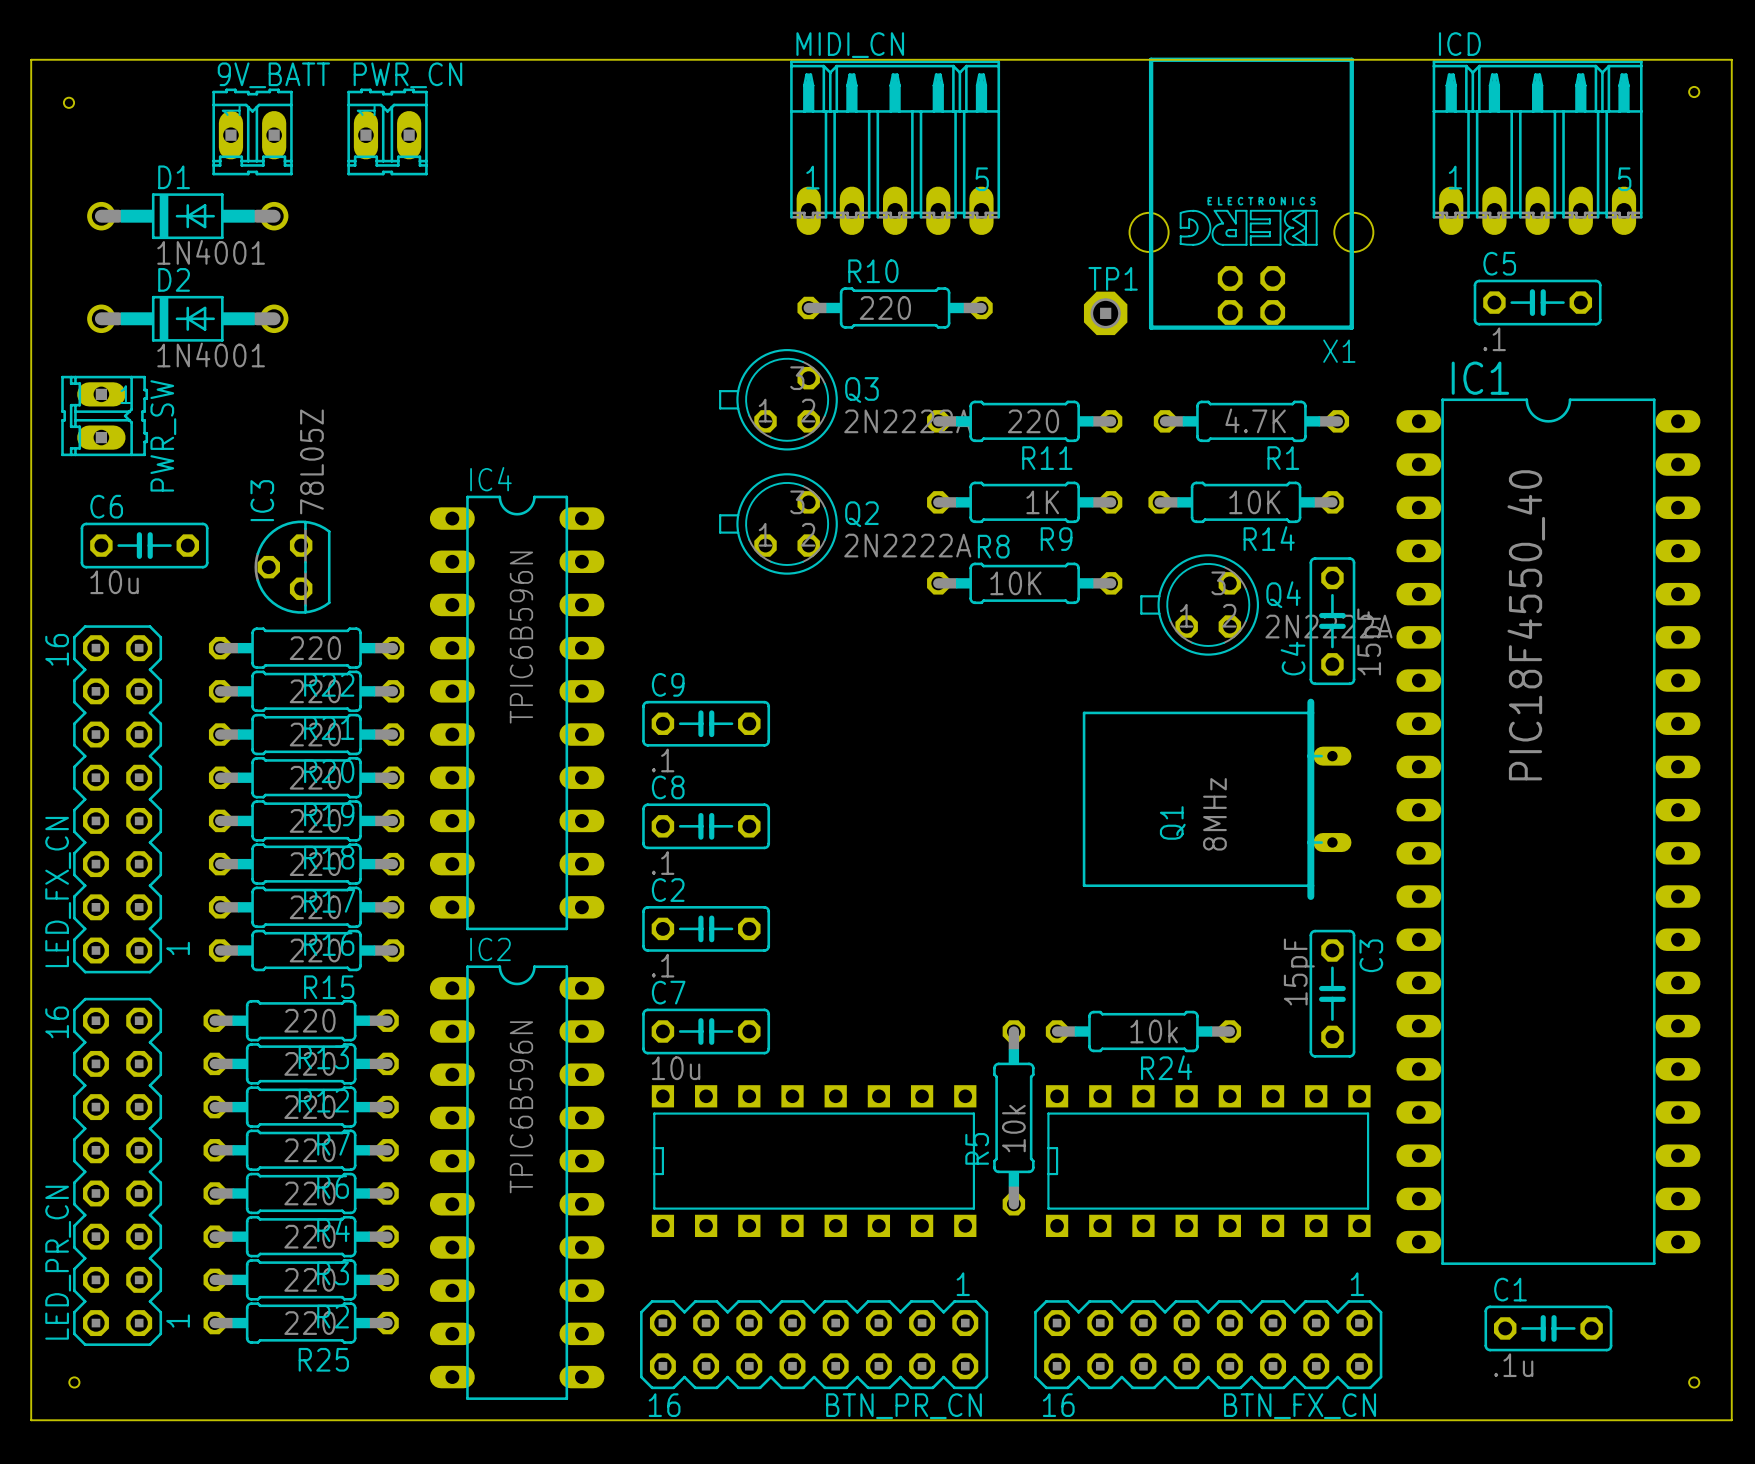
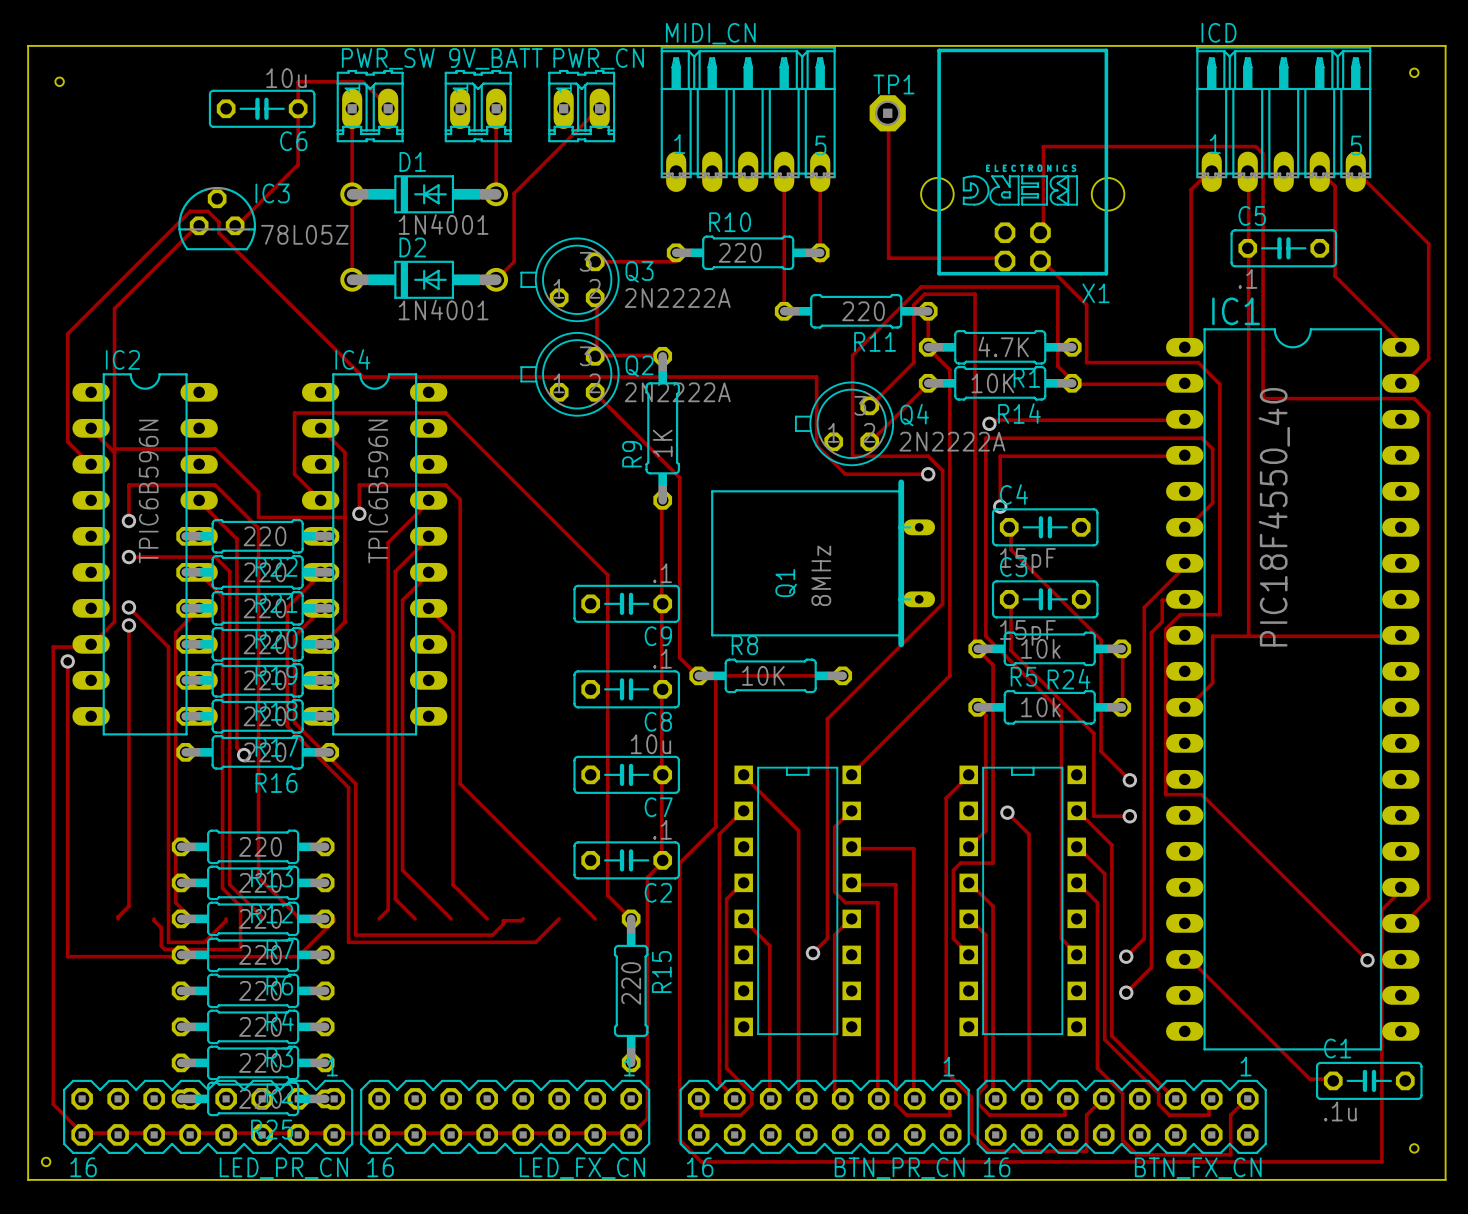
9V_BATT position: (252, 131) -> (478, 106)
PWR_CN position: (387, 131) -> (581, 106)
PWR_SW: none -> (370, 106)
track: none -> (352, 108) (352, 279)
track: none -> (388, 108) (362, 81) (298, 81) (298, 164) (235, 225)
track: none -> (496, 108) (496, 194)
track: none -> (599, 108) (514, 193) (514, 261) (496, 279)
track: none -> (887, 113) (888, 258) (1003, 258) (1005, 261)
X1 position: (1251, 193) -> (1022, 162)
track: none -> (784, 171) (784, 311)
track: none -> (820, 171) (820, 261)
track: none -> (1211, 171) (1209, 171) (1191, 189) (1191, 344) (1189, 347)
track: none -> (1247, 171) (1248, 636)
track: none -> (1319, 171) (1335, 186) (1335, 276) (1405, 347)
track: none -> (1355, 171) (1428, 243) (1428, 359) (1405, 383)
D1 position: (187, 216) -> (424, 194)
track: none -> (199, 225) (114, 308) (114, 621) (89, 647) (53, 647) (53, 1104) (82, 1133)
track: none -> (1040, 232) (1043, 229) (1043, 146) (1255, 146) (1263, 153) (1263, 398) (1414, 398) (1428, 413) (1428, 899) (1405, 923)
TP1 position: (1105, 313) -> (887, 113)
track: none -> (1040, 261) (1043, 261) (1086, 305) (1086, 362) (1198, 362) (1219, 384) (1219, 614) (1180, 614) (1165, 629) (1165, 794) (1201, 794) (1367, 960)
D2 position: (187, 318) -> (424, 279)
track: none -> (595, 261) (676, 261)
track: none -> (595, 297) (596, 297) (596, 355)
track: none -> (928, 311) (928, 348) (949, 369) (949, 675) (851, 774)
Q3 position: (778, 399) -> (569, 279)
PWR_SW: (104, 415) -> none
R11 position: (1024, 421) -> (856, 311)
R1 position: (1251, 421) -> (1000, 347)
track: none -> (596, 355) (662, 356)
track: none -> (928, 383) (869, 441)
track: none -> (1189, 383) (1072, 384) (1072, 380) (1057, 366) (1057, 287) (921, 287) (852, 355) (852, 456) (928, 456) (942, 470) (942, 603) (827, 719) (827, 938) (813, 953)
track: none -> (595, 392) (679, 477) (679, 657) (698, 675)
track: none -> (869, 405) (913, 362) (913, 305) (924, 294) (975, 294) (975, 647) (993, 665) (993, 863) (960, 863) (953, 870) (953, 938) (968, 954)
R9 rotation: 0° (1024, 502) -> 90° clockwise (662, 428)
R9 position: (1024, 502) -> (662, 428)
R14 position: (1246, 502) -> (1000, 383)
R14 value position: 10K (1254, 502) -> 10K (992, 383)
track: none -> (1189, 419) (989, 420) (989, 423)
via: none -> (989, 423)
track: none -> (91, 428) (114, 452)
track: none -> (320, 428) (344, 452) (344, 621) (320, 644)
Q2 position: (778, 523) -> (569, 374)
track: none -> (114, 449) (215, 449) (258, 492) (258, 517) (344, 517)
C6 rotation: 0° (144, 545) -> 180° (262, 108)
C6 position: (144, 545) -> (262, 108)
track: none -> (1189, 455) (1000, 456) (1000, 506)
track: none -> (91, 464) (67, 441) (67, 333) (190, 211) (208, 211) (218, 222) (218, 233) (362, 377) (816, 377) (816, 445) (845, 474) (928, 474)
IC3 rotation: 0° (292, 567) -> 90° clockwise (217, 218)
IC3 position: (292, 567) -> (217, 218)
via: none -> (928, 474)
R8 position: (1024, 583) -> (770, 675)
track: none -> (199, 500) (236, 539) (236, 747) (244, 755)
track: none -> (320, 500) (294, 474) (294, 413) (445, 413) (607, 575) (607, 895) (631, 918)
track: none -> (428, 500) (388, 542) (388, 909) (379, 918)
track: none -> (662, 500) (662, 860) (647, 877) (647, 1118) (631, 1134) (629, 1133) (596, 1133) (595, 1134) (593, 1133) (560, 1133) (559, 1134) (557, 1133) (524, 1133) (523, 1134) (521, 1133) (488, 1133) (487, 1134) (485, 1133) (452, 1133) (451, 1134) (449, 1133) (416, 1133) (415, 1134) (413, 1133) (380, 1133) (379, 1134) (377, 1133) (82, 1133)
Q4 position: (1199, 604) -> (844, 423)
via: none -> (1000, 506)
track: none -> (359, 513) (359, 485) (445, 485) (460, 499) (460, 783) (595, 918)
via: none -> (359, 513)
C4 rotation: 0° (1332, 621) -> 90° clockwise (1045, 527)
C4 position: (1332, 621) -> (1045, 527)
track: none -> (128, 521) (128, 485) (215, 485) (258, 528) (258, 877) (298, 918)
via: none -> (128, 521)
track: none -> (1009, 527) (1011, 528) (1011, 549) (1101, 639) (1101, 751) (1129, 780)
track: none -> (1189, 527) (1212, 503) (1212, 449) (1201, 438) (985, 438) (985, 636) (1061, 711) (1061, 938) (1076, 954)
track: none -> (428, 536) (395, 571) (395, 899) (415, 918)
track: none -> (128, 557) (215, 557) (229, 571) (229, 884) (262, 918)
via: none -> (128, 557)
track: none -> (1189, 563) (1144, 607) (1144, 938) (1126, 956)
track: none -> (199, 572) (222, 596) (222, 888) (240, 906) (240, 949) (164, 949) (161, 945) (161, 927) (154, 918)
track: none -> (320, 572) (287, 607) (287, 726) (348, 787) (348, 942) (535, 942) (559, 918)
track: none -> (428, 572) (402, 600) (402, 870) (451, 918)
IC4 position: (517, 712) -> (374, 554)
C9 rotation: 0° (706, 723) -> 180° (626, 603)
track: none -> (1009, 599) (1011, 600) (1011, 650) (1093, 733) (1093, 816) (1129, 816)
track: none -> (1189, 599) (1162, 600) (1162, 621) (1151, 632) (1151, 967) (1126, 992)
track: none -> (128, 607) (168, 647) (168, 942) (204, 942) (226, 918)
via: none -> (128, 607)
track: none -> (199, 608) (175, 632) (175, 902) (190, 918)
track: none -> (320, 608) (294, 636) (294, 722) (355, 783) (355, 935) (492, 935) (503, 924) (503, 920) (521, 920) (523, 918)
track: none -> (428, 608) (452, 632) (452, 884) (487, 918)
track: none -> (128, 625) (128, 906) (118, 918)
via: none -> (128, 625)
track: none -> (1405, 635) (1212, 636) (1212, 683) (1189, 707)
track: none -> (1121, 648) (1121, 707)
track: none -> (67, 661) (67, 956) (298, 956) (334, 918)
via: none -> (67, 661)
LED_FX_CN: (117, 799) -> none
Q1 position: (1217, 799) -> (823, 563)
track: none -> (842, 675) (715, 675) (715, 827) (679, 863) (679, 1140) (701, 1161) (1381, 1161) (1381, 909) (1405, 887)
C8 rotation: 0° (706, 826) -> 180° (626, 689)
track: none -> (977, 707) (985, 715) (985, 830) (968, 846)
via: none -> (244, 755)
C2 rotation: 0° (706, 928) -> 180° (626, 860)
C2 position: (706, 928) -> (626, 860)
track: none -> (743, 774) (798, 830) (798, 1089) (806, 1098)
track: none -> (968, 774) (946, 798) (946, 1071) (971, 1097) (971, 1133) (989, 1151) (1086, 1151) (1086, 1115) (1103, 1098)
via: none -> (1129, 780)
R15 rotation: 0° (306, 950) -> 90° clockwise (631, 990)
R15 position: (306, 950) -> (631, 990)
track: none -> (743, 810) (719, 834) (719, 1082) (734, 1098)
track: none -> (851, 810) (834, 827) (834, 891) (845, 902) (877, 902) (878, 1098)
track: none -> (1076, 810) (1111, 845) (1111, 1035) (1175, 1098)
track: none -> (1007, 812) (1029, 834) (1029, 1097) (1031, 1098)
via: none -> (1007, 812)
via: none -> (1129, 816)
R15 name position: R15 (329, 987) -> R15 (661, 972)
C3 rotation: 0° (1332, 993) -> 90° counterclockwise (1045, 599)
C3 position: (1332, 993) -> (1045, 599)
track: none -> (851, 846) (852, 848) (913, 848) (914, 1098)
track: none -> (1076, 846) (1104, 873) (1104, 1039) (1158, 1093) (1158, 1104) (1169, 1115) (1209, 1115) (1209, 1100) (1211, 1098)
C7 rotation: 0° (706, 1031) -> 180° (626, 774)
C7 position: (706, 1031) -> (626, 774)
R24 position: (1143, 1031) -> (1049, 648)
R24 value position: 10k (1154, 1031) -> 10k (1040, 648)
track: none -> (743, 882) (726, 899) (726, 1068) (751, 1093) (751, 1104) (741, 1115) (701, 1115) (701, 1100) (698, 1098)
track: none -> (851, 882) (852, 884) (895, 884) (895, 1104) (906, 1115) (949, 1115) (950, 1098)
track: none -> (968, 882) (993, 906) (993, 1097) (995, 1098)
track: none -> (1076, 882) (1097, 902) (1097, 1068) (1122, 1093) (1122, 1140) (1137, 1154) (1230, 1154) (1230, 1115) (1247, 1098)
part: none -> (797, 900)
track: none -> (743, 918) (769, 945) (770, 1098)
track: none -> (851, 918) (834, 935) (834, 1089) (842, 1098)
track: none -> (968, 918) (985, 935) (985, 1086) (978, 1093) (978, 1104) (989, 1115) (1065, 1115) (1065, 1100) (1067, 1098)
R5 rotation: 0° (1013, 1117) -> 90° clockwise (1049, 707)
R5 position: (1013, 1117) -> (1049, 707)
via: none -> (813, 953)
via: none -> (1126, 956)
track: none -> (1189, 959) (1309, 1079) (1331, 1079) (1333, 1080)
via: none -> (1367, 960)
part: (814, 1161) -> none
part rotation: 0° (1208, 1161) -> 90° clockwise (1022, 900)
LED_PR_CN: (117, 1171) -> none
IC2 position: (517, 1182) -> (145, 554)
via: none -> (1126, 992)
C1 position: (1548, 1328) -> (1369, 1080)
LED_PR_CN: none -> (208, 1116)
LED_FX_CN: none -> (505, 1116)
BTN_PR_CN position: (814, 1344) -> (824, 1116)
BTN_FX_CN position: (1208, 1344) -> (1121, 1116)
hole position: (74, 1382) -> (46, 1161)

